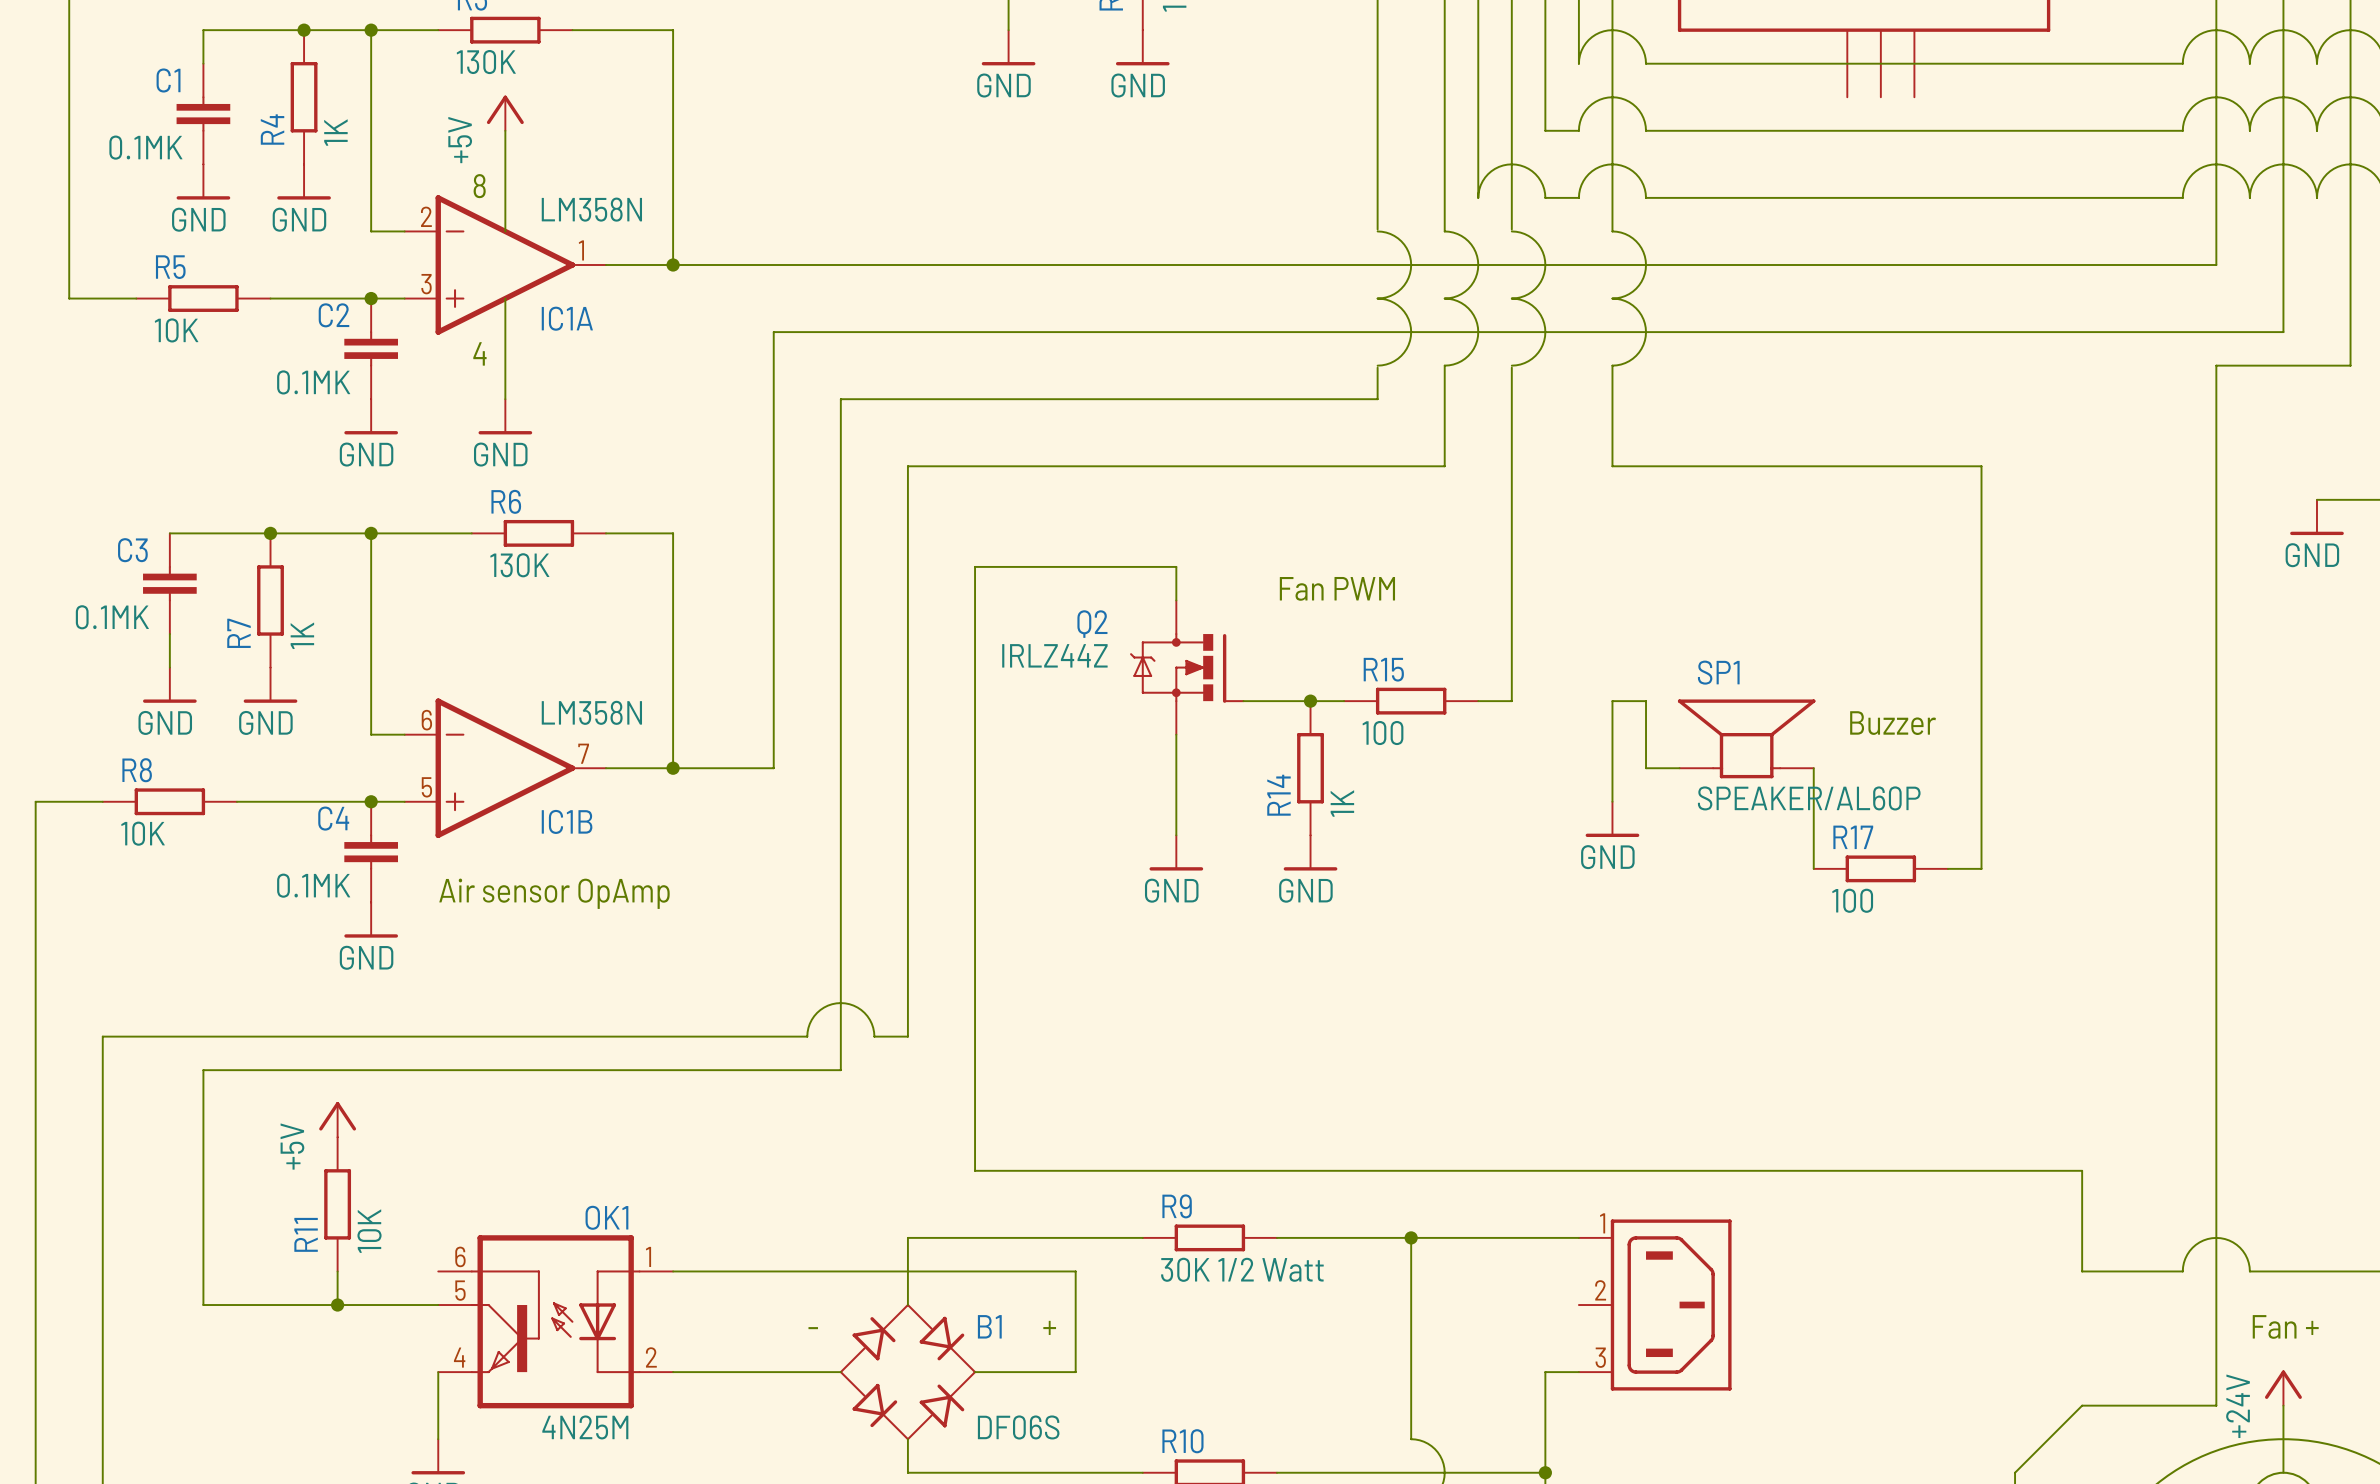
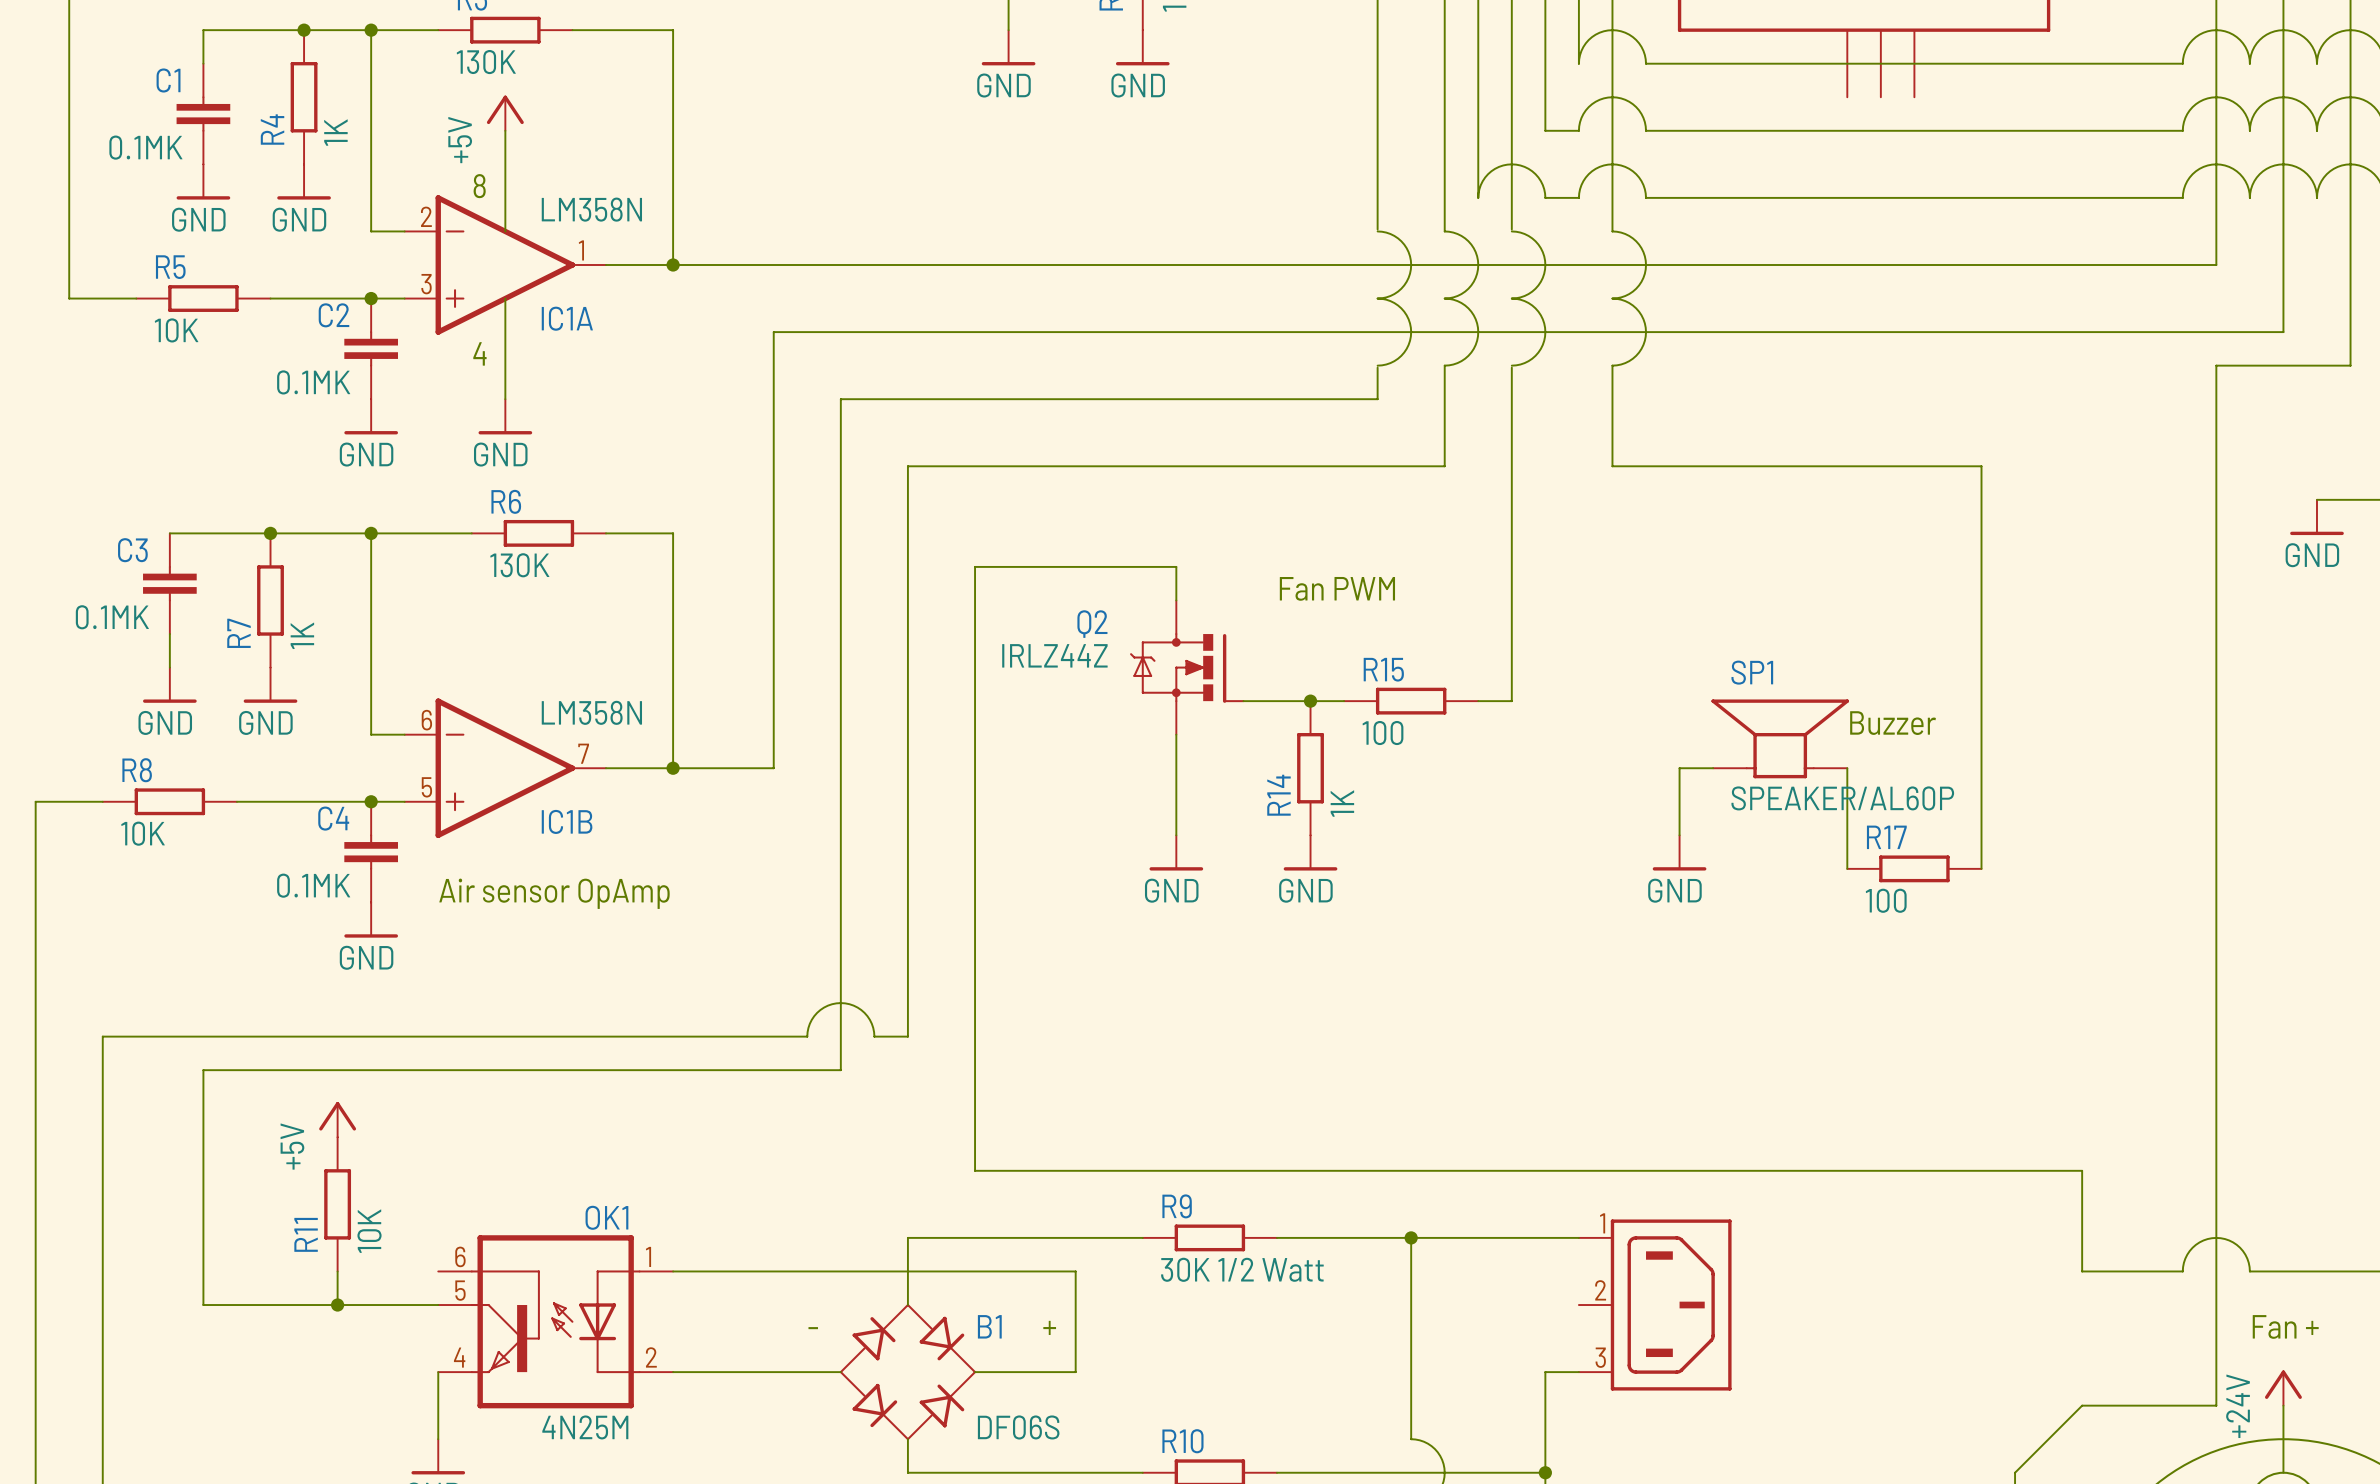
SP1 position: (1746, 738) -> (1780, 738)
wire: (1679, 768) (1646, 768) (1646, 701) (1612, 701) (1612, 801) -> none
wire: none -> (1713, 768) (1679, 768) (1679, 835)
wire: (1813, 768) (1813, 868) -> (1847, 768) (1847, 868)
power symbol position: GND (1612, 819) -> GND (1679, 852)
R17 position: (1880, 868) -> (1914, 868)

